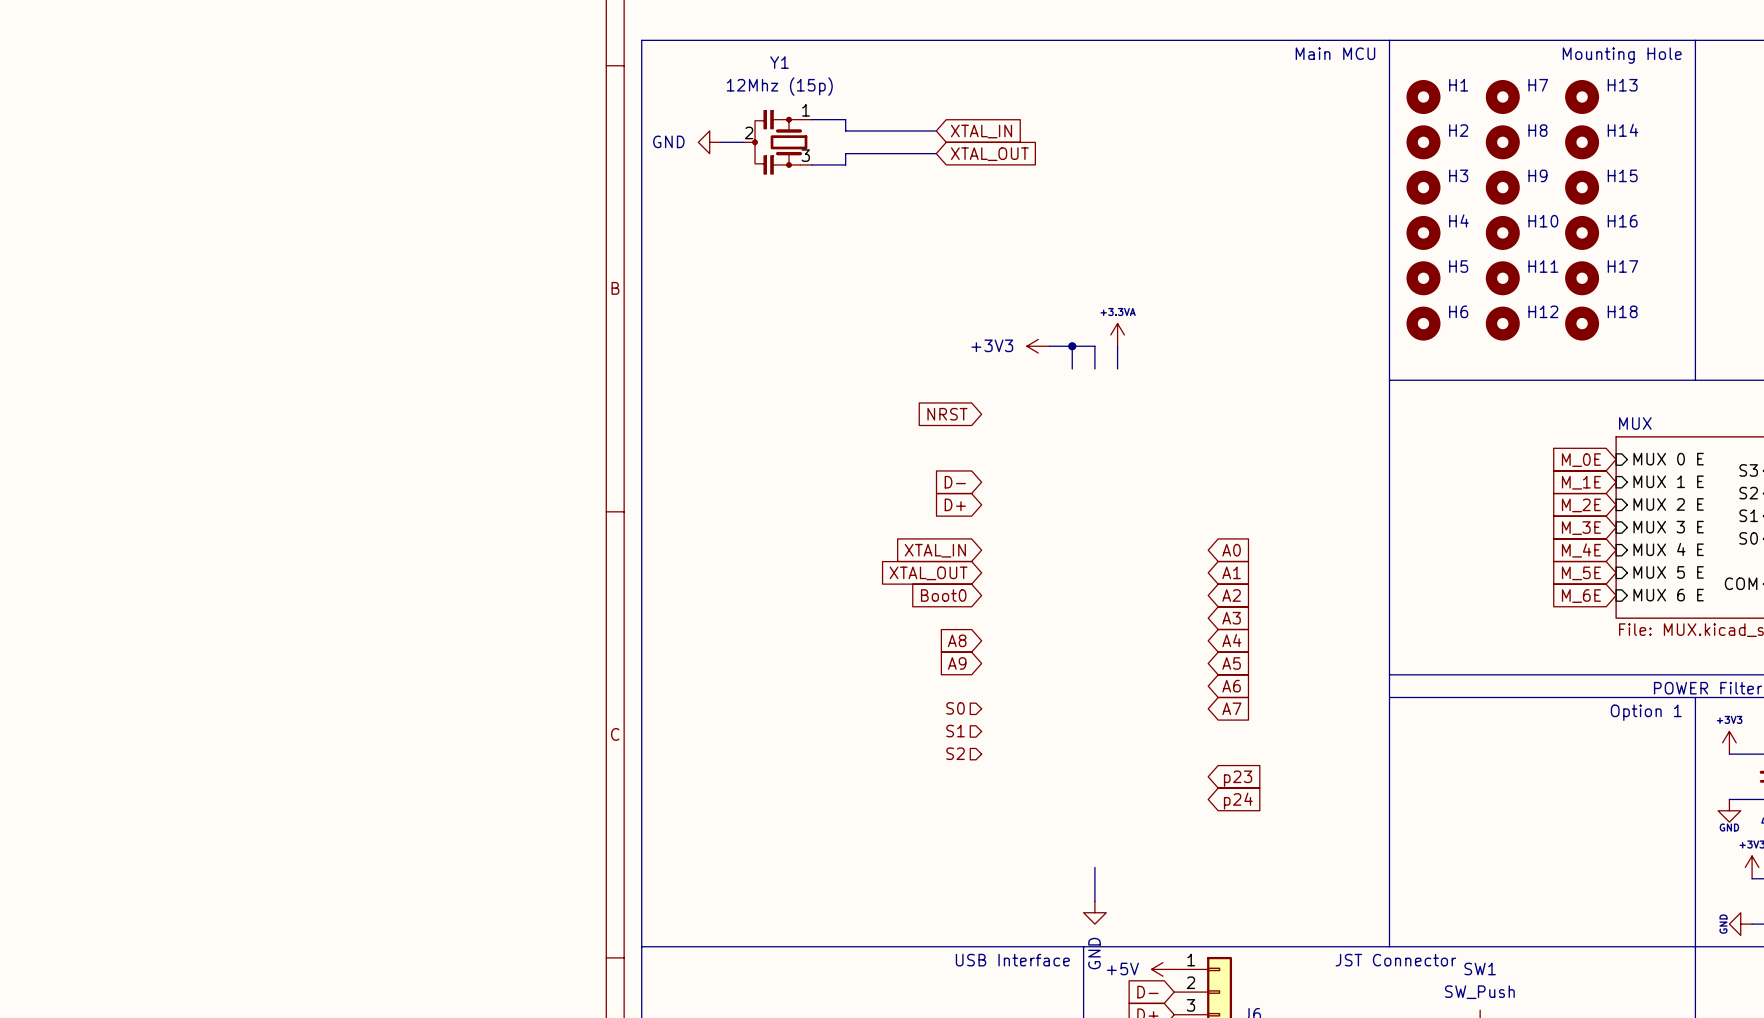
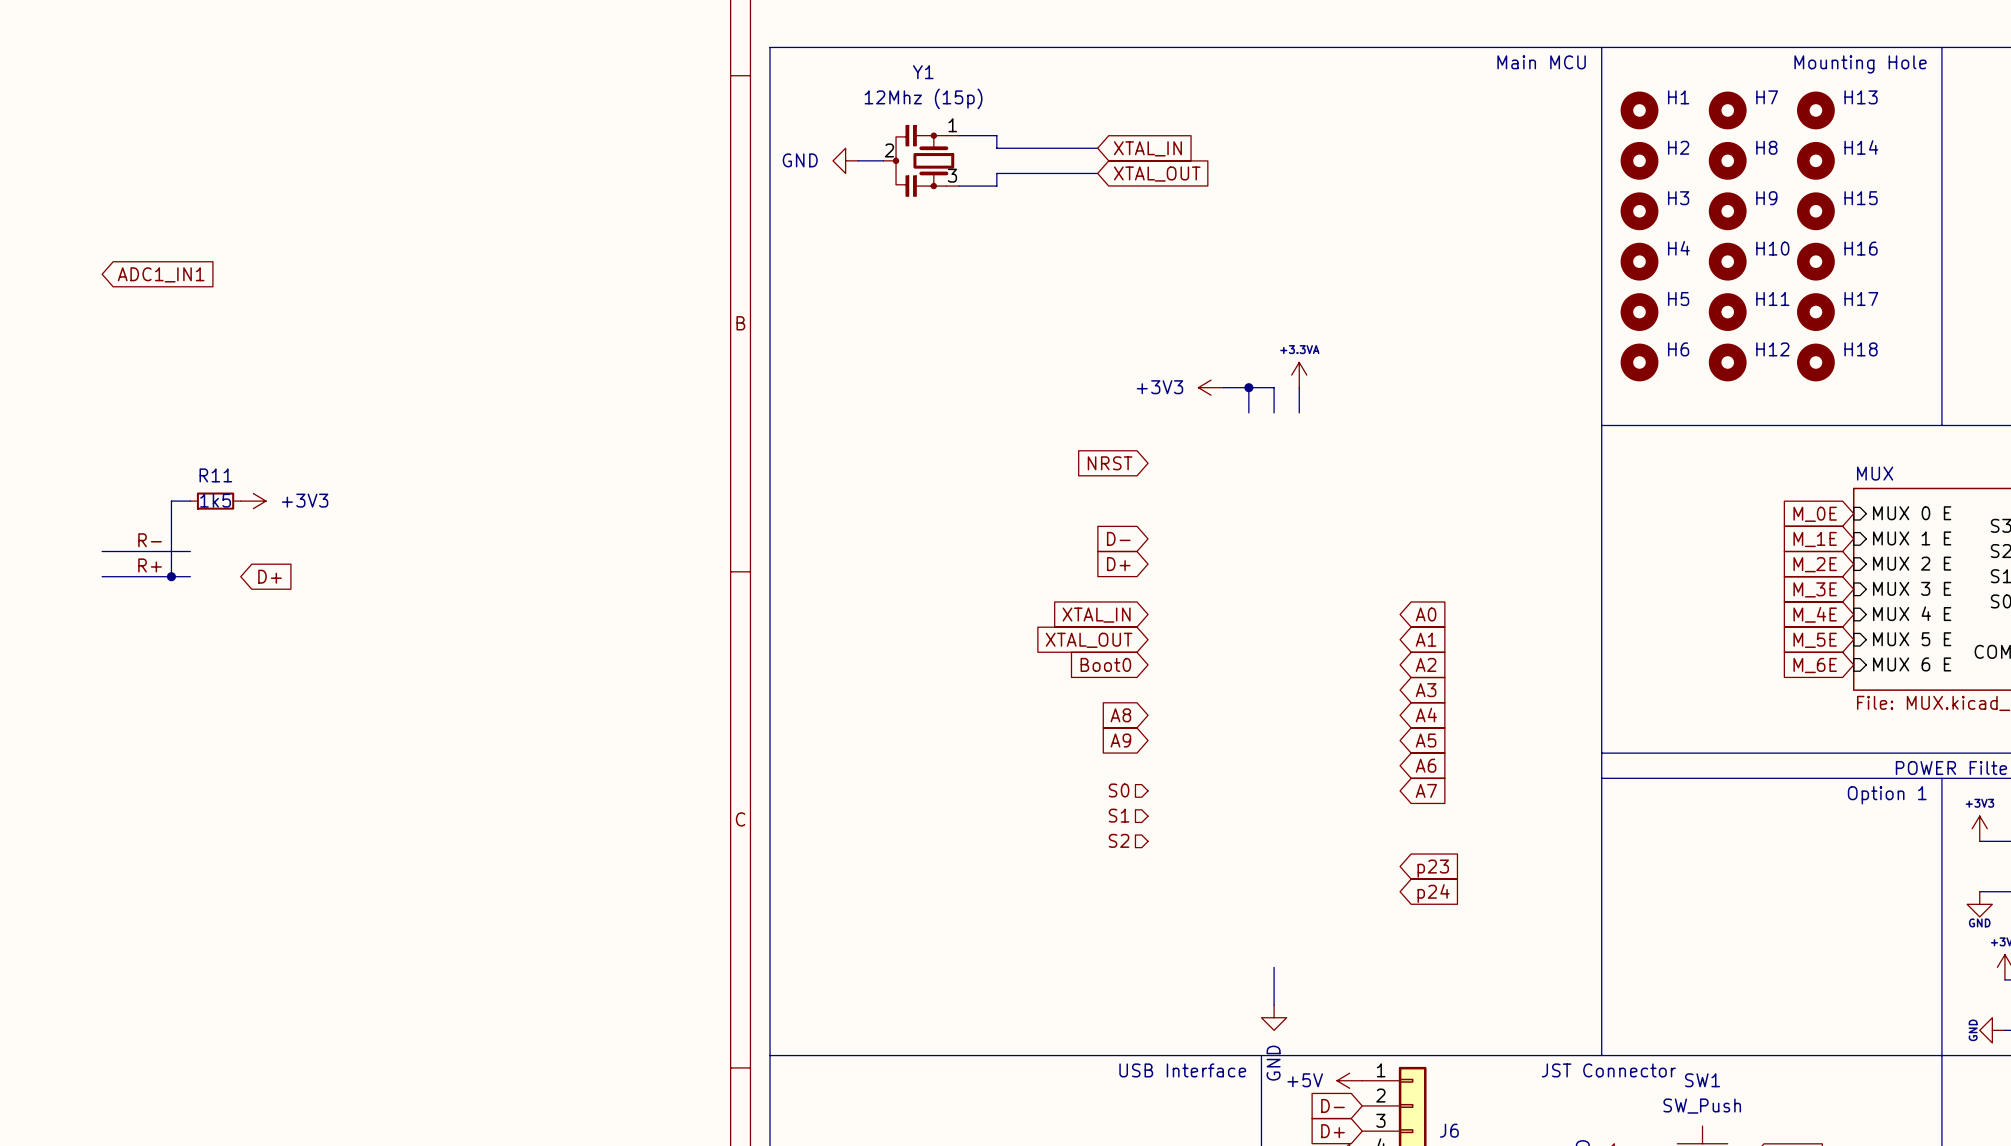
global label: none -> ADC1_IN1 (161, 274)
wire: none -> (190, 501) (171, 501) (171, 576)
R11: none -> 1k5 (215, 501)
power symbol: none -> +3V3 (253, 501)
label: none -> R- (150, 540)
wire: none -> (102, 551) (190, 551)
label: none -> R+ (150, 565)
wire: none -> (102, 576) (190, 576)
junction: none -> (171, 576)
global label: none -> D+ (270, 576)

